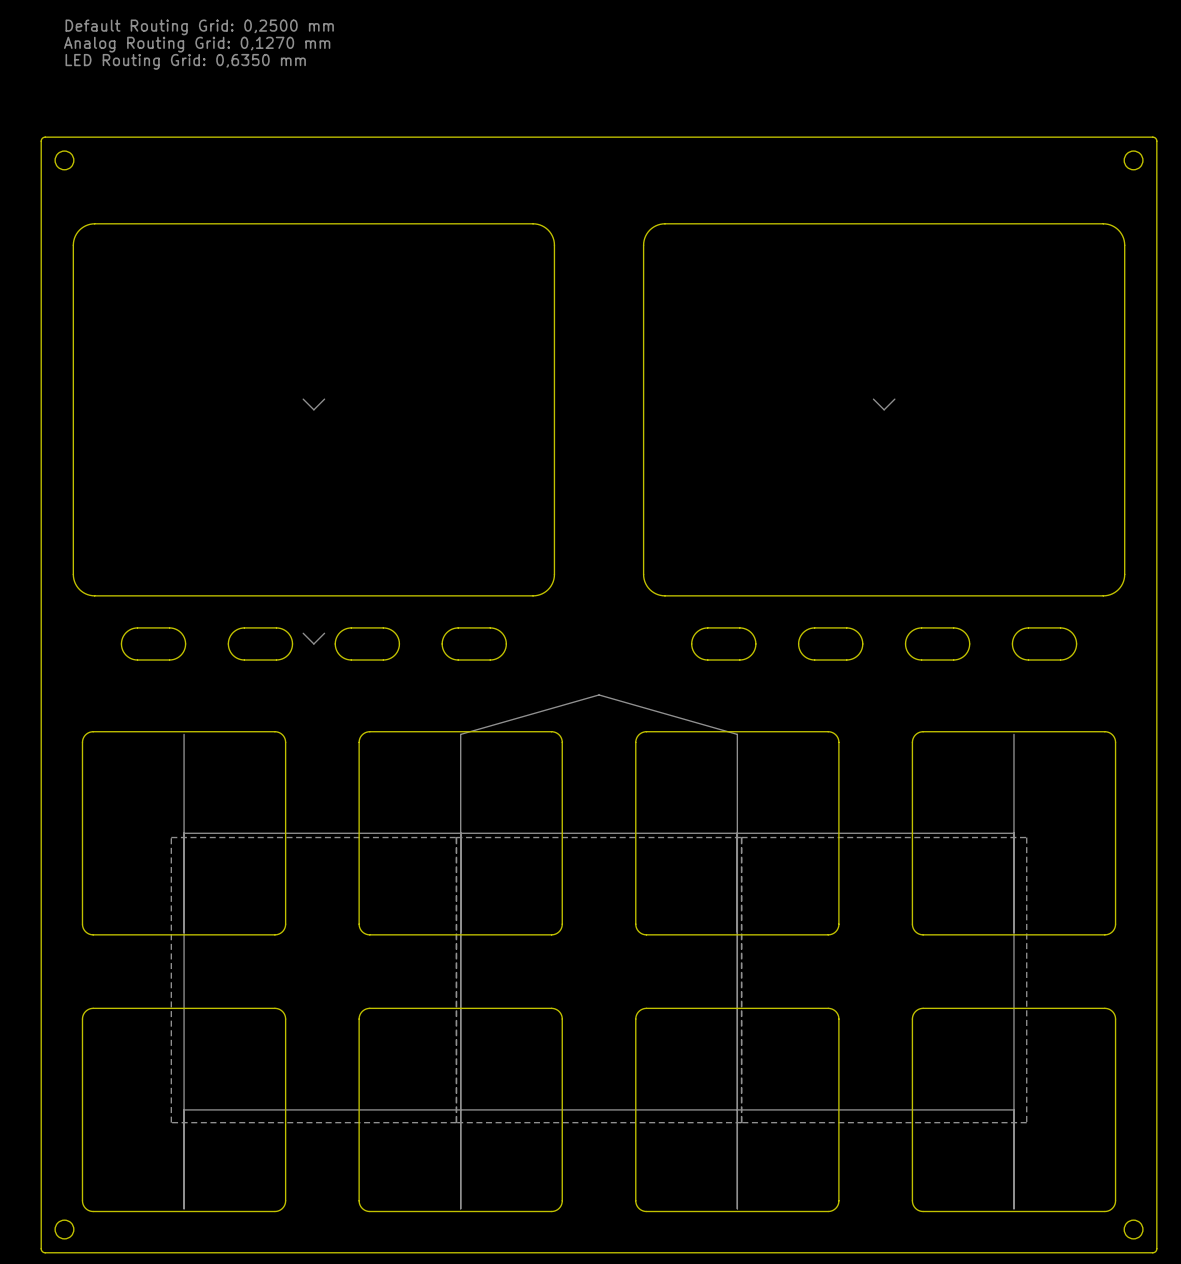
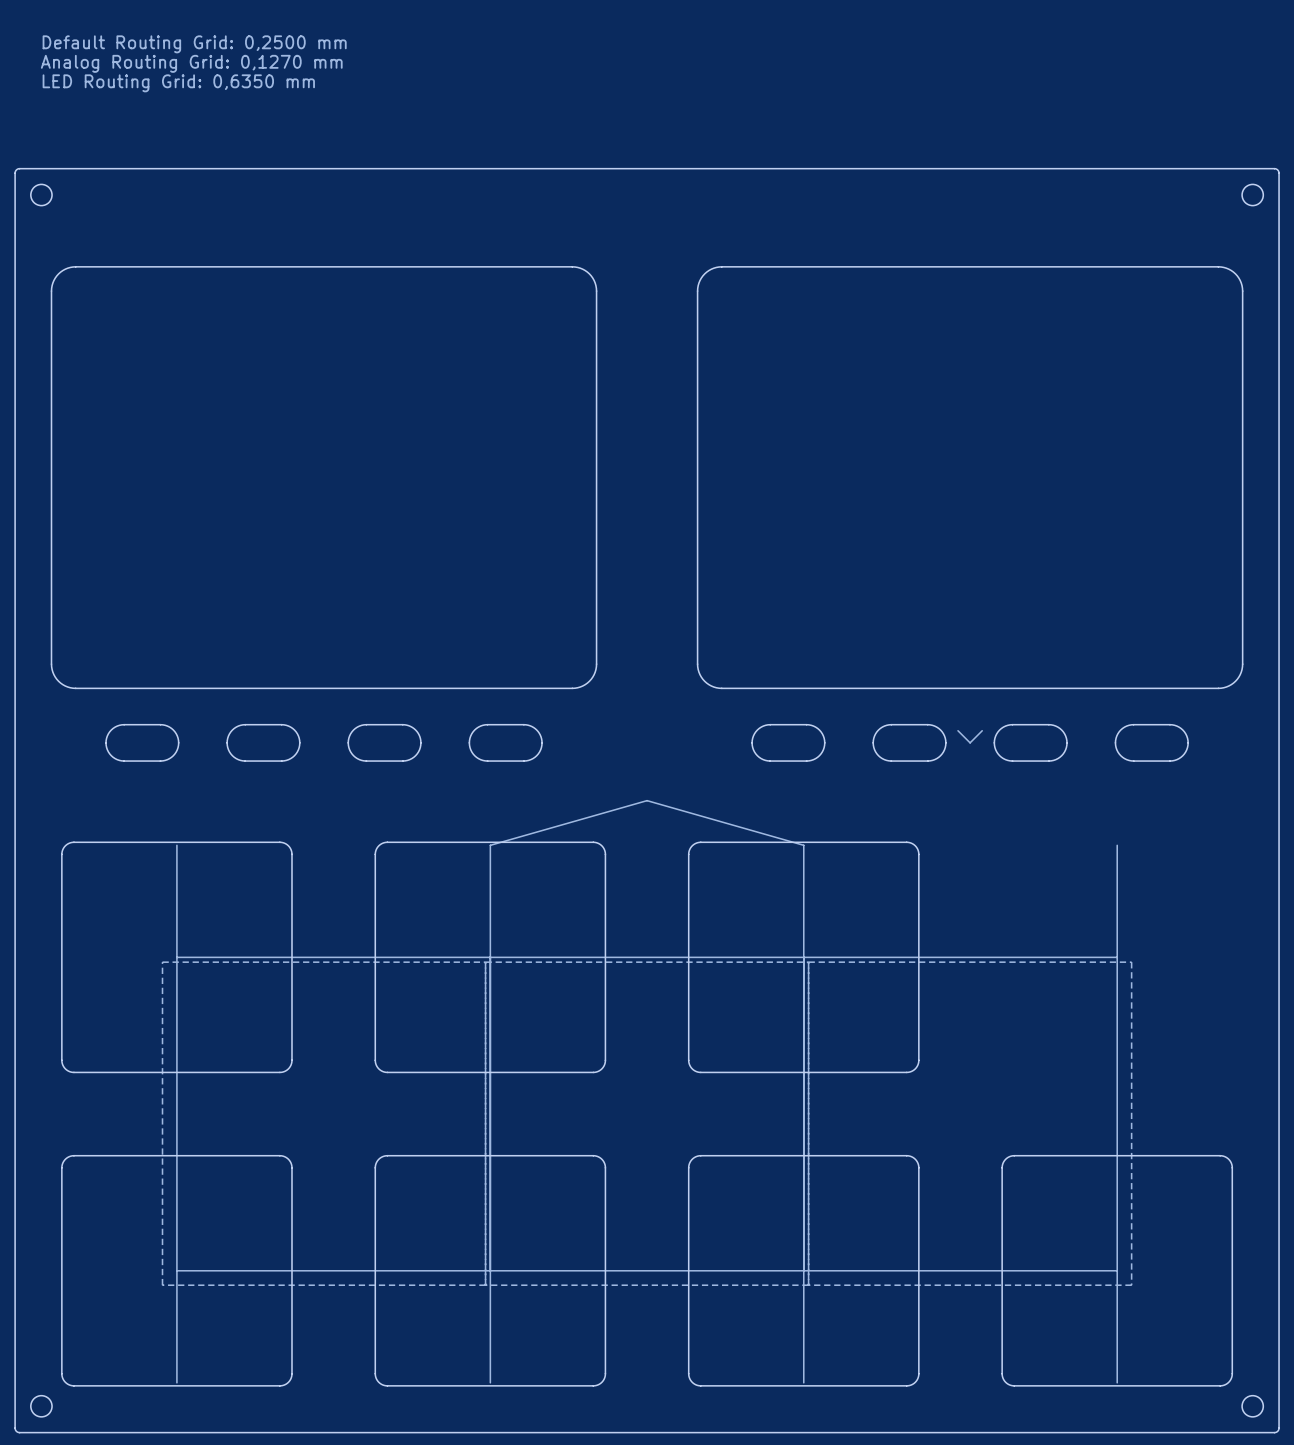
drawing: [40, 136, 1158, 1254] -> none
line: (303, 633) (313, 643) (324, 633) -> none
line: none -> (957, 730) (970, 742) (982, 730)

